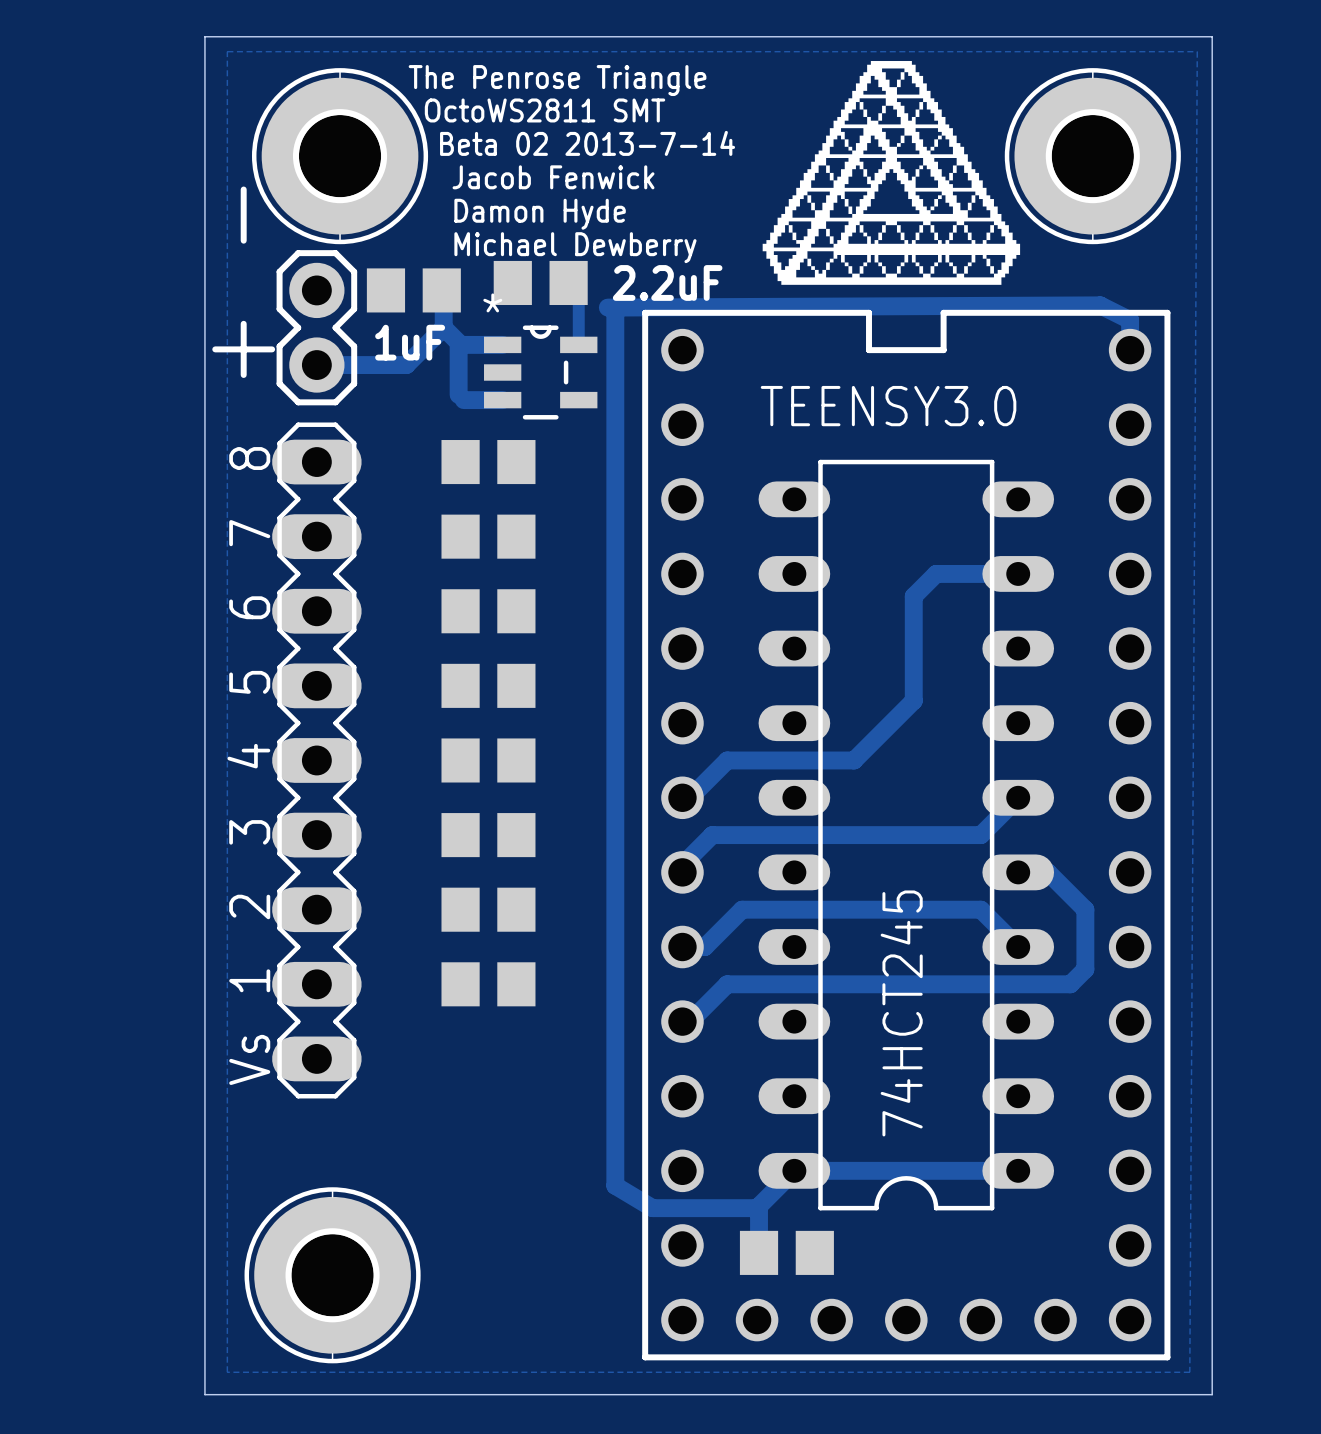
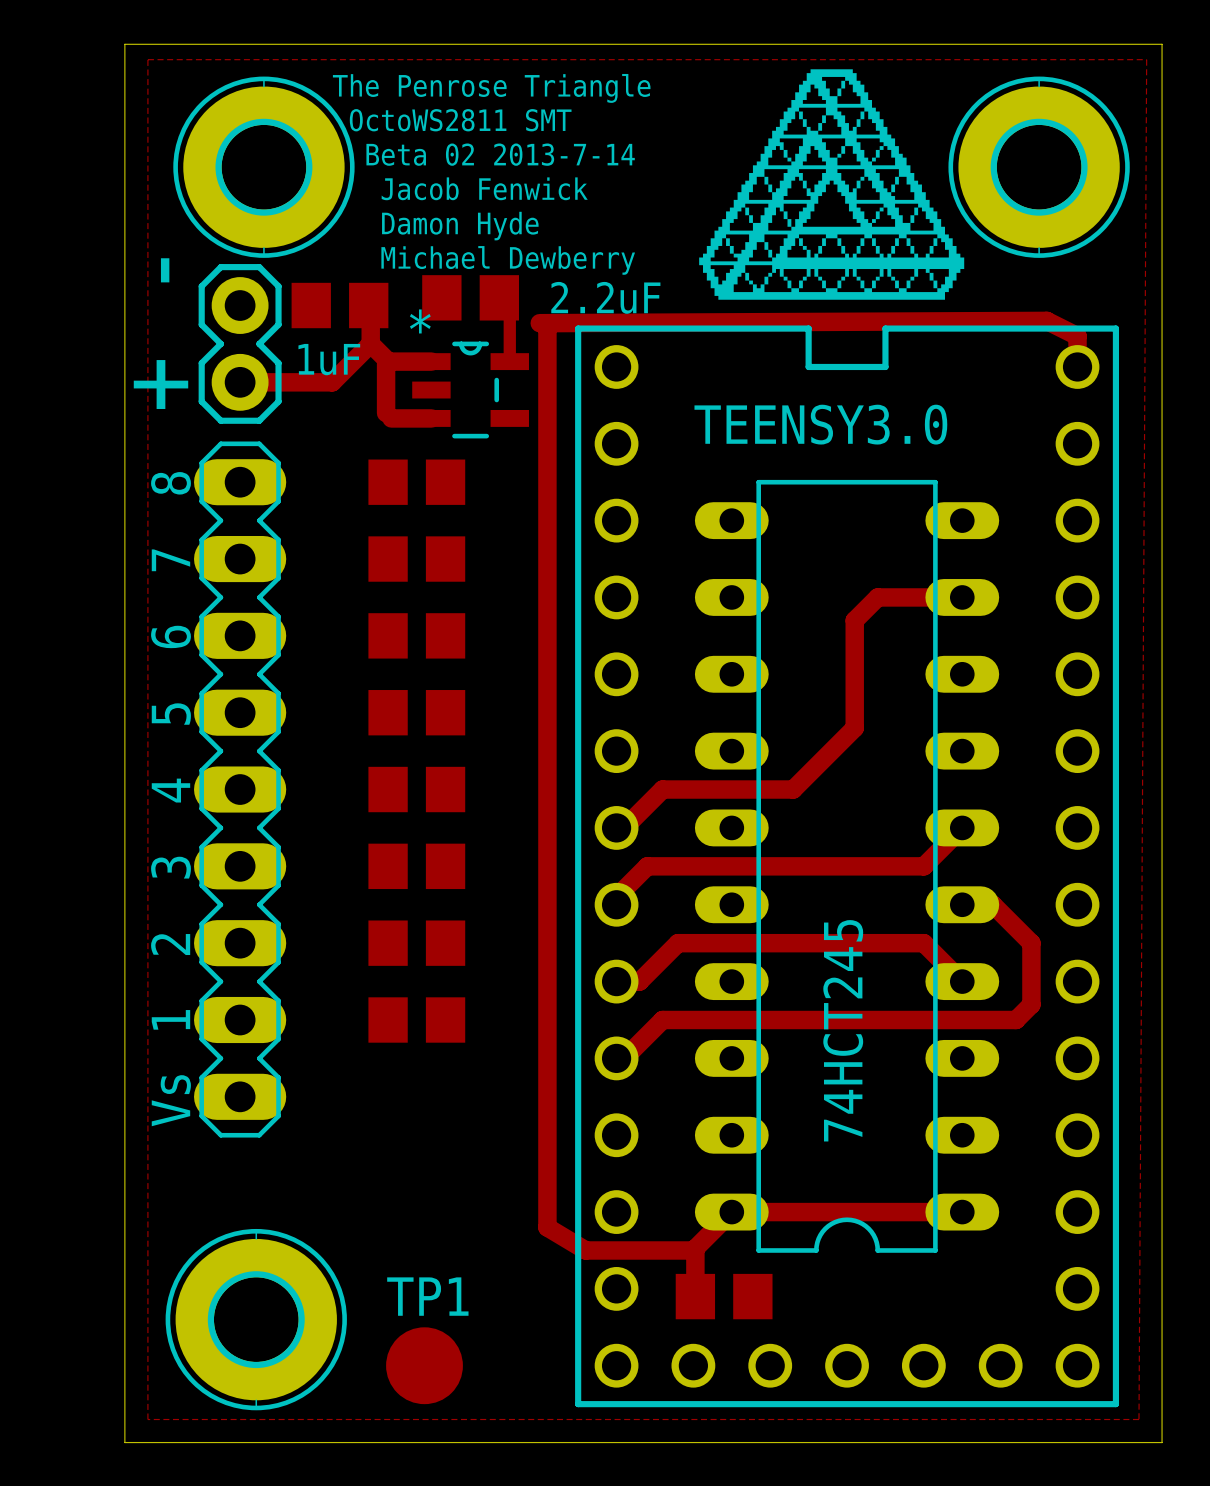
TP1: none -> (424, 1365)

